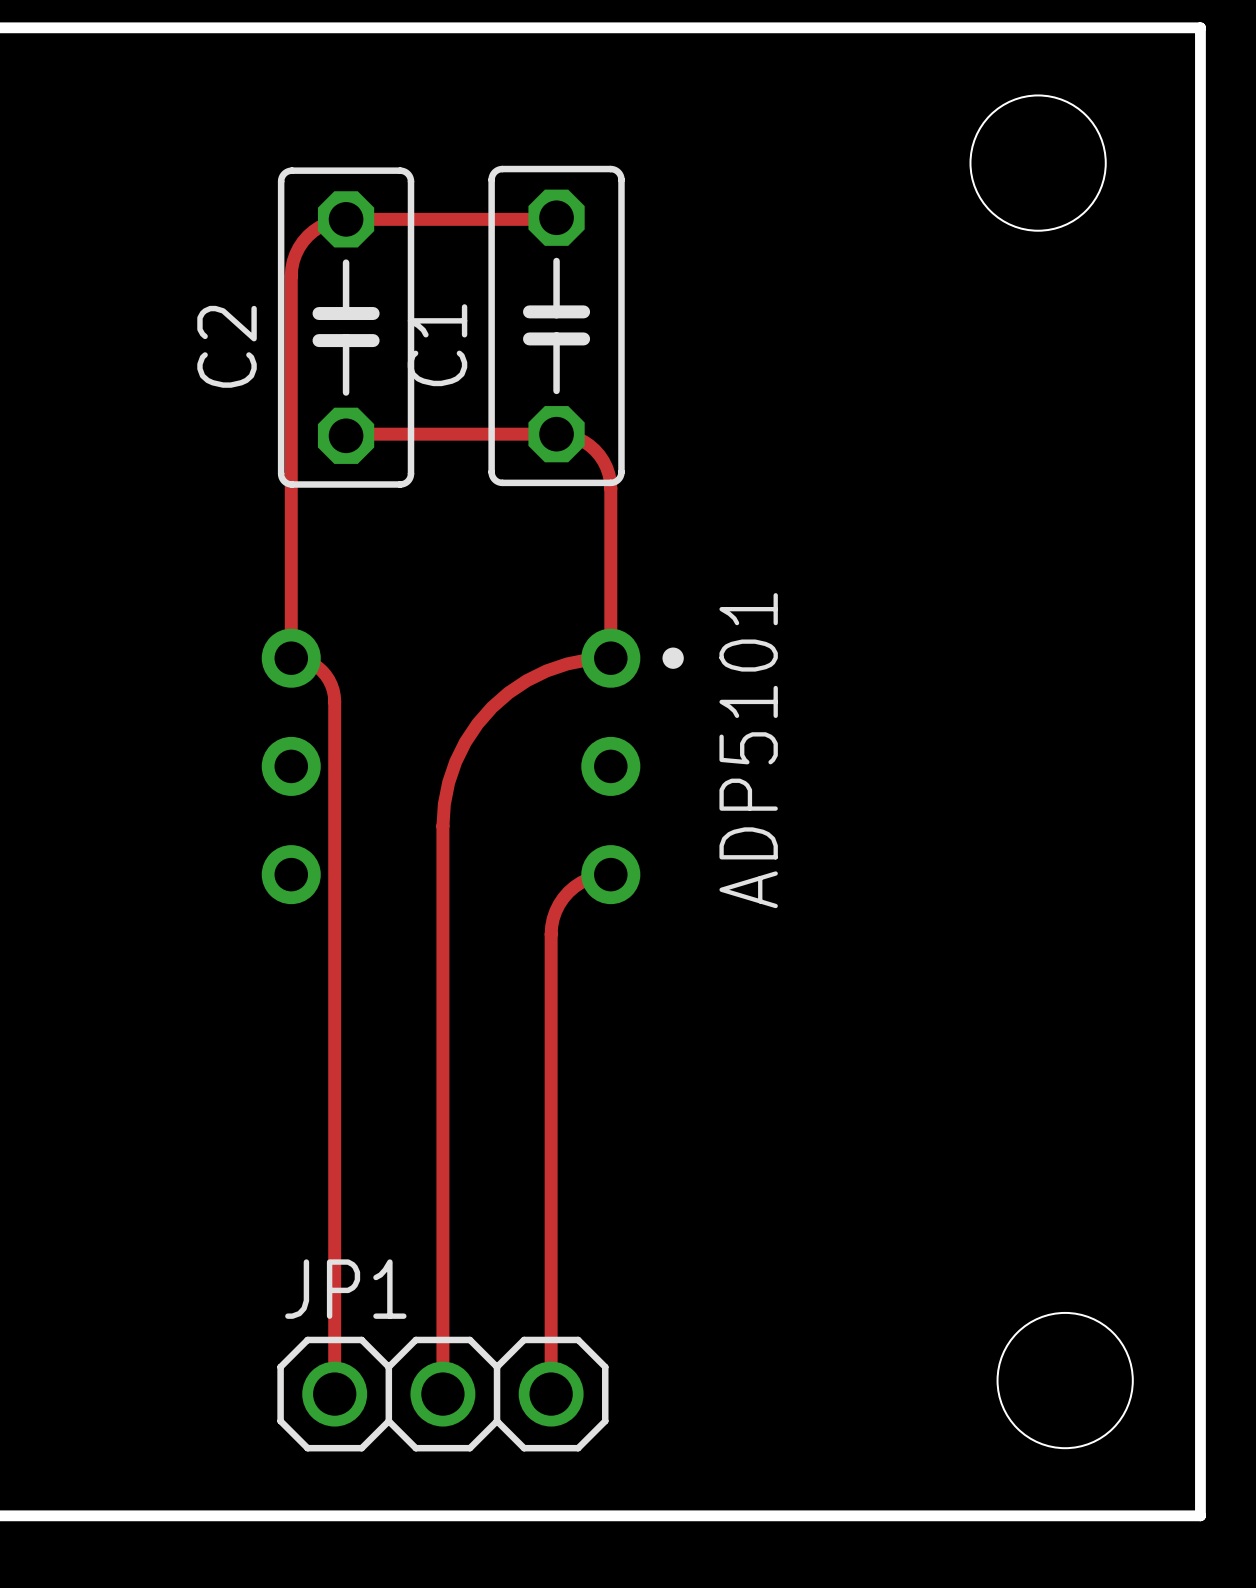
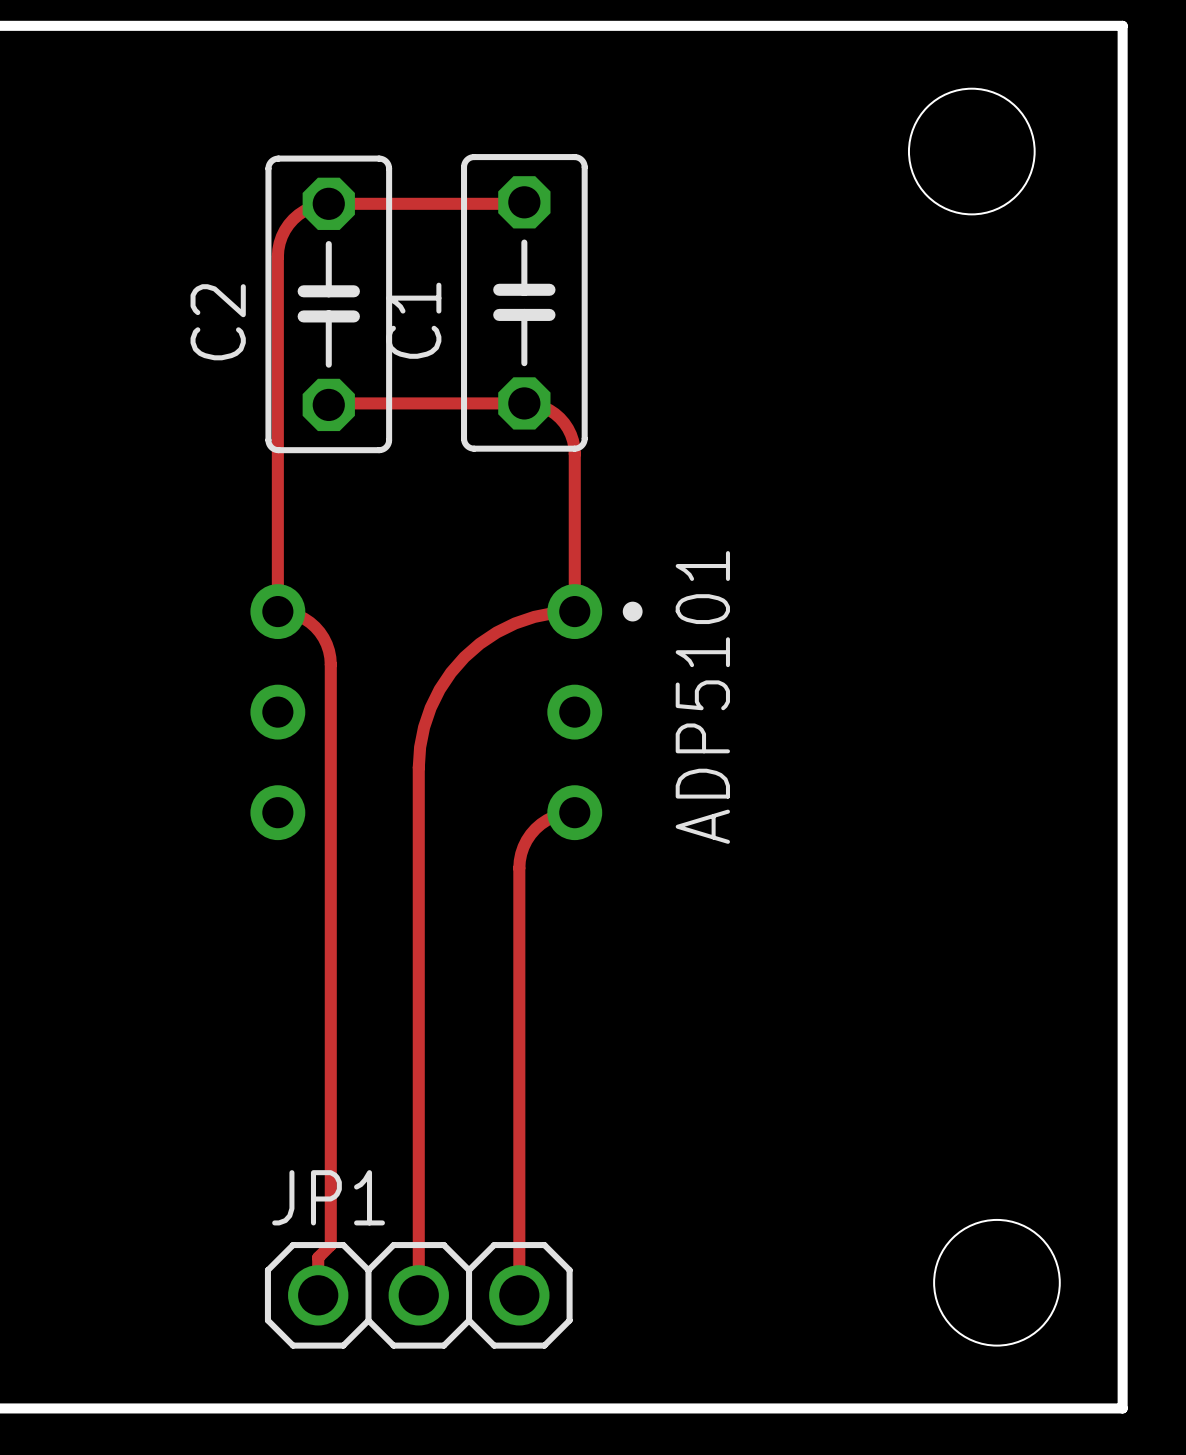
top track: (291, 658) (307, 661) (321, 670) (331, 685) (334, 701) (334, 1353) -> (277, 611) (298, 615) (315, 627) (326, 644) (330, 664) (330, 1245) (318, 1257)

